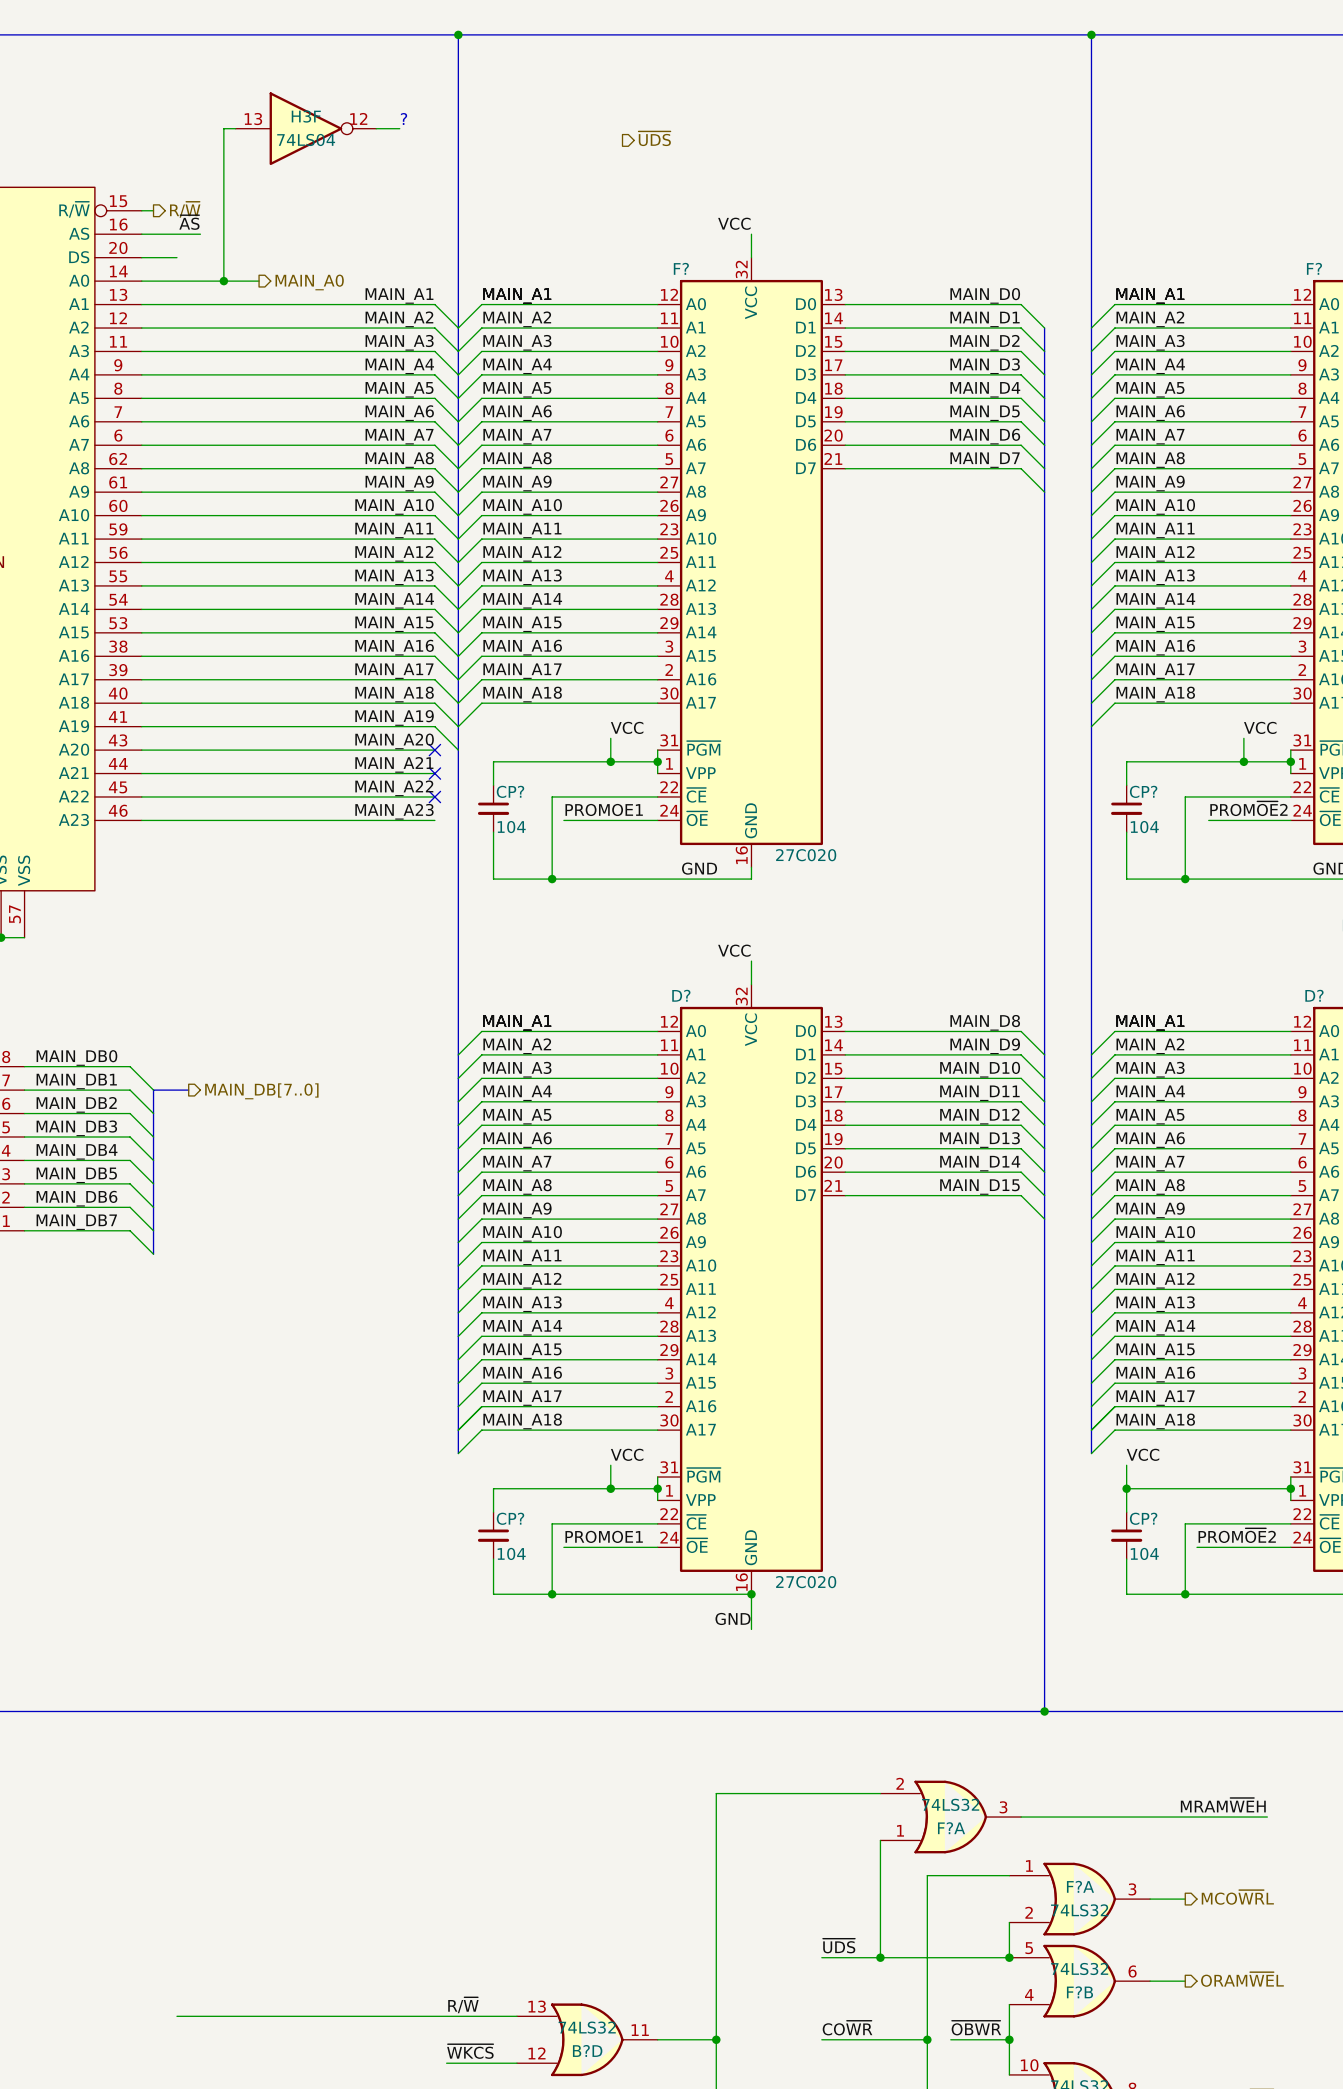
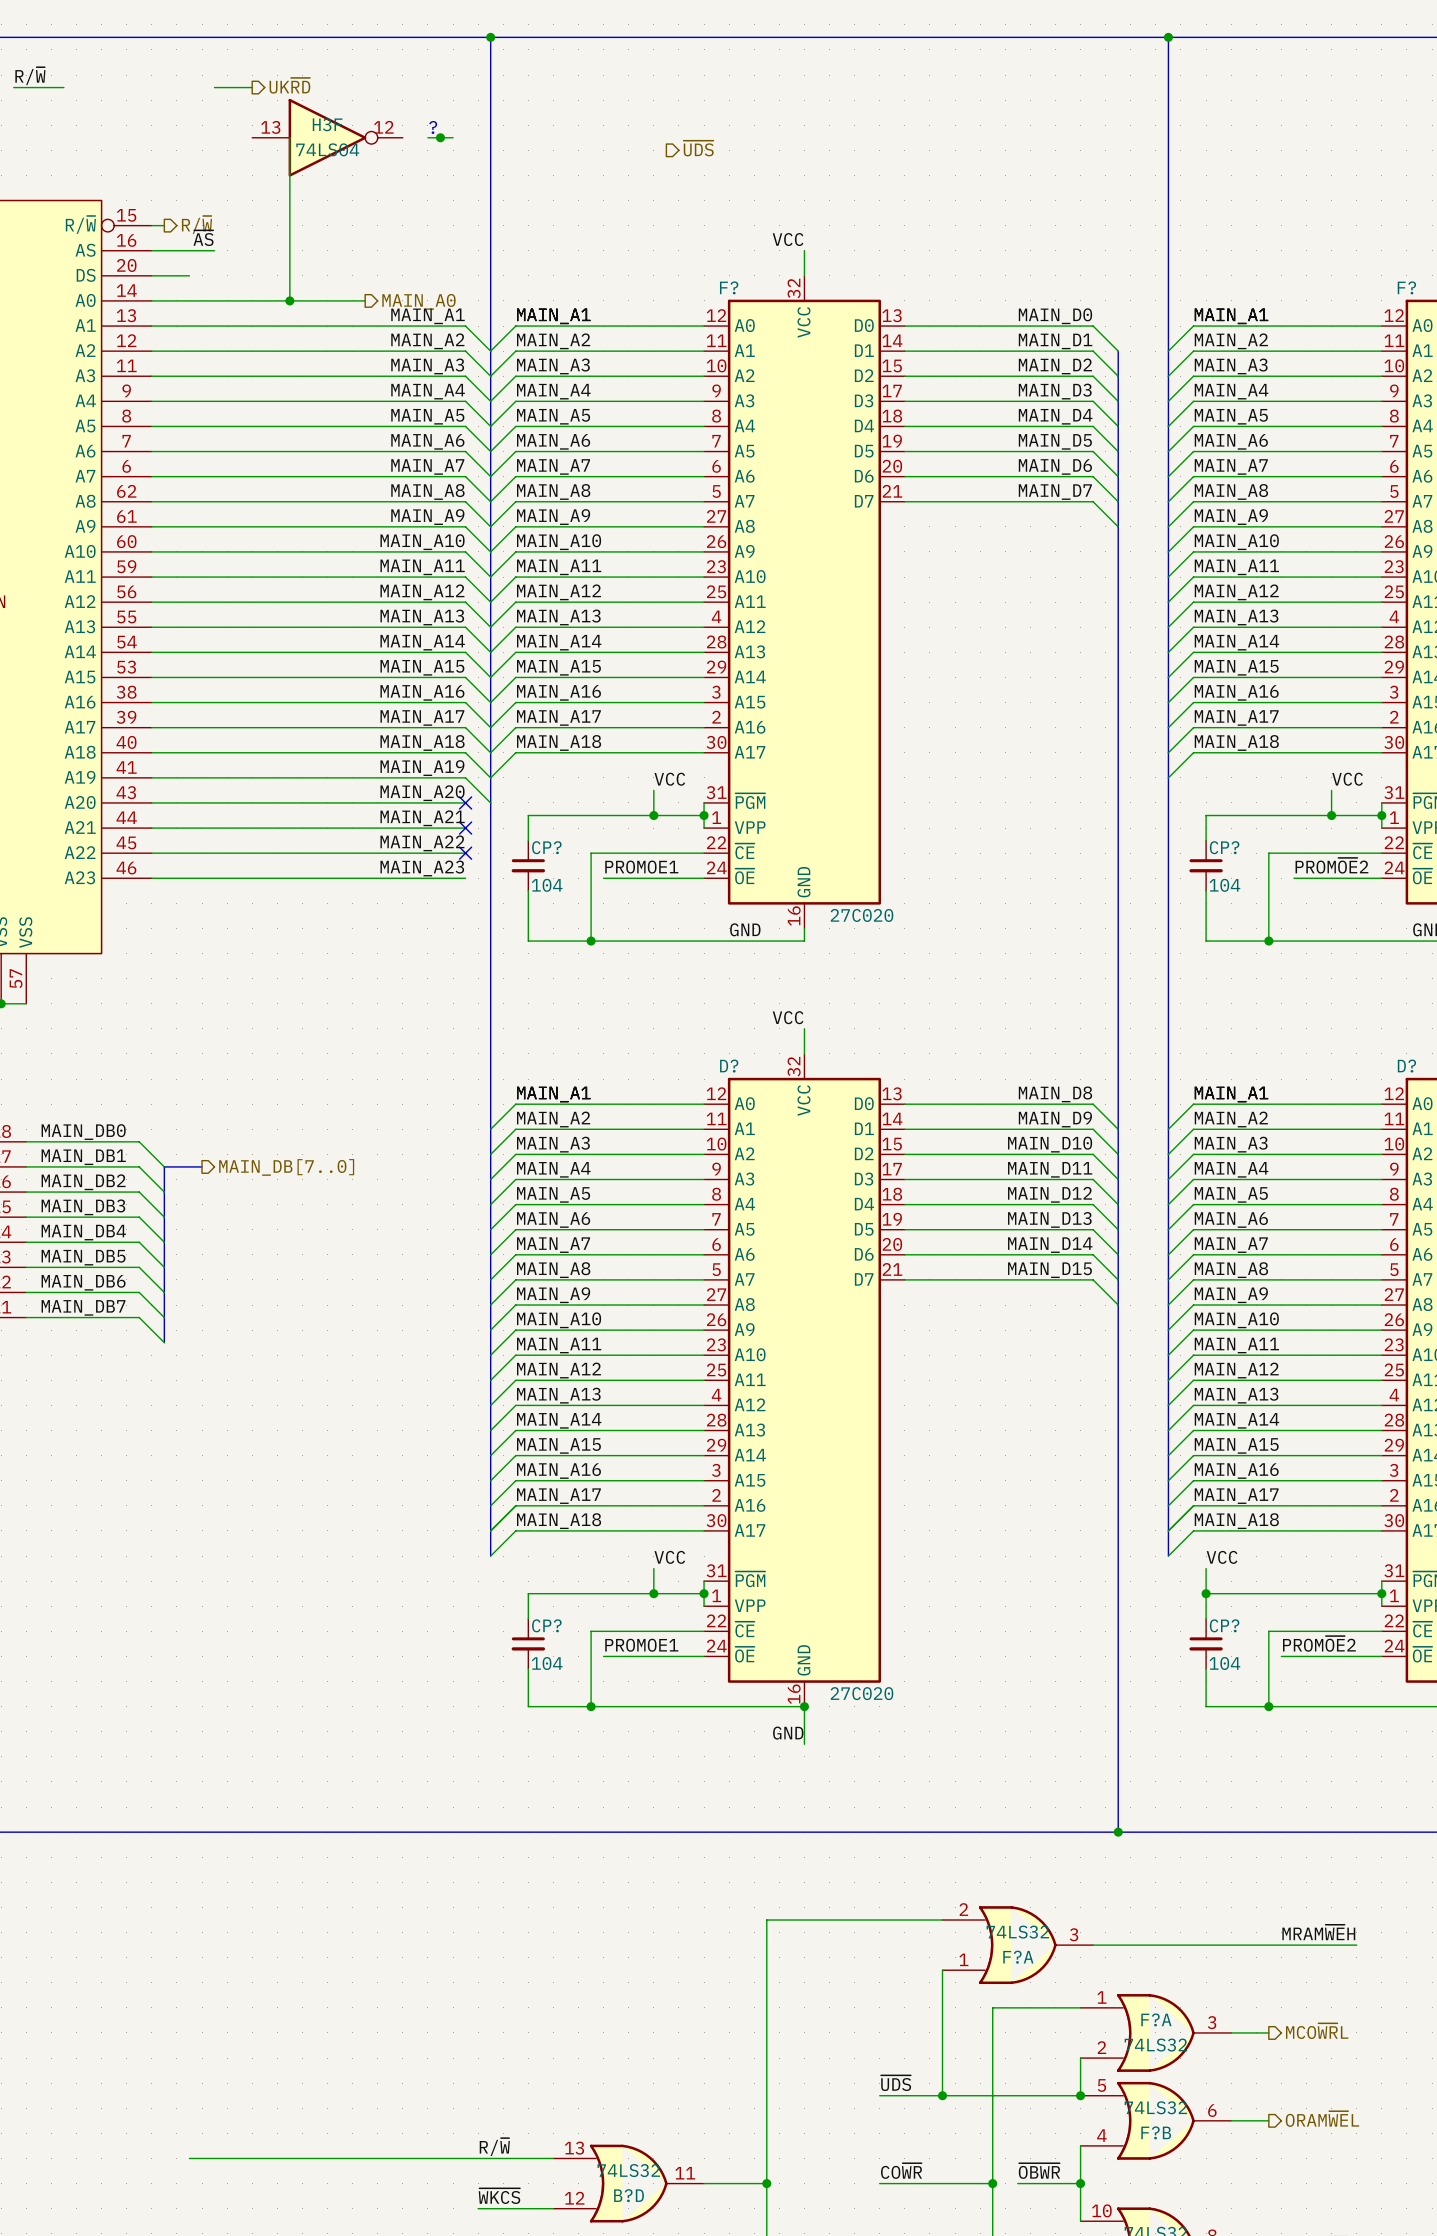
label: none -> R/~{W} (30, 76)
hierarchical label: none -> UK~{RD} (289, 85)
wire: none -> (13, 87) (63, 87)
wire: none -> (214, 87) (252, 87)
wire: (235, 128) (223, 128) (223, 281) -> none
wire: none -> (289, 137) (289, 300)
wire: (376, 128) (399, 128) -> (453, 137) (427, 137)
junction: none -> (440, 137)
junction position: (223, 281) -> (289, 300)
wire: none -> (277, 300) (365, 300)
hierarchical label position: MAIN_A0 (309, 282) -> MAIN_A0 (418, 301)

